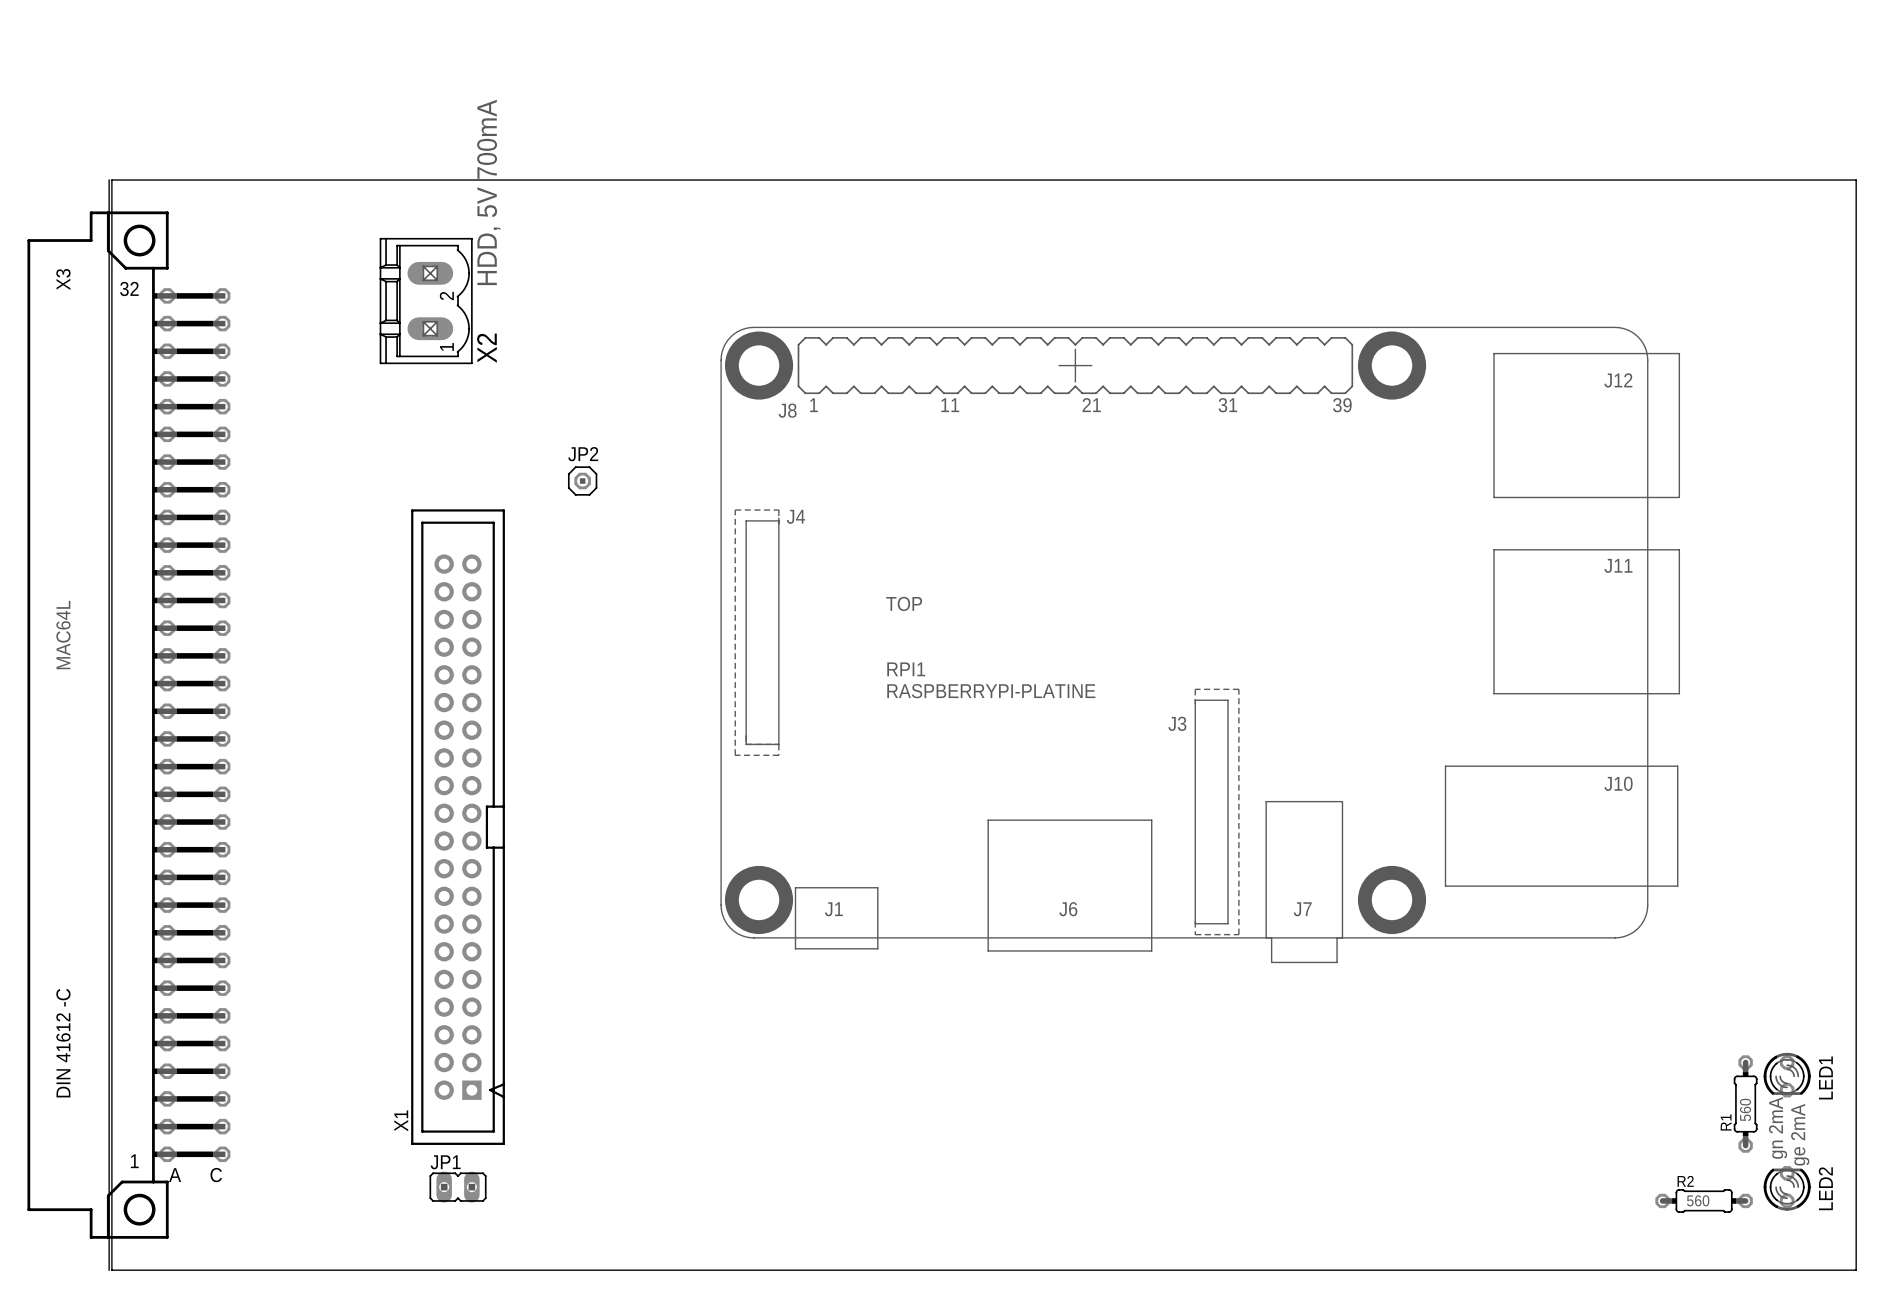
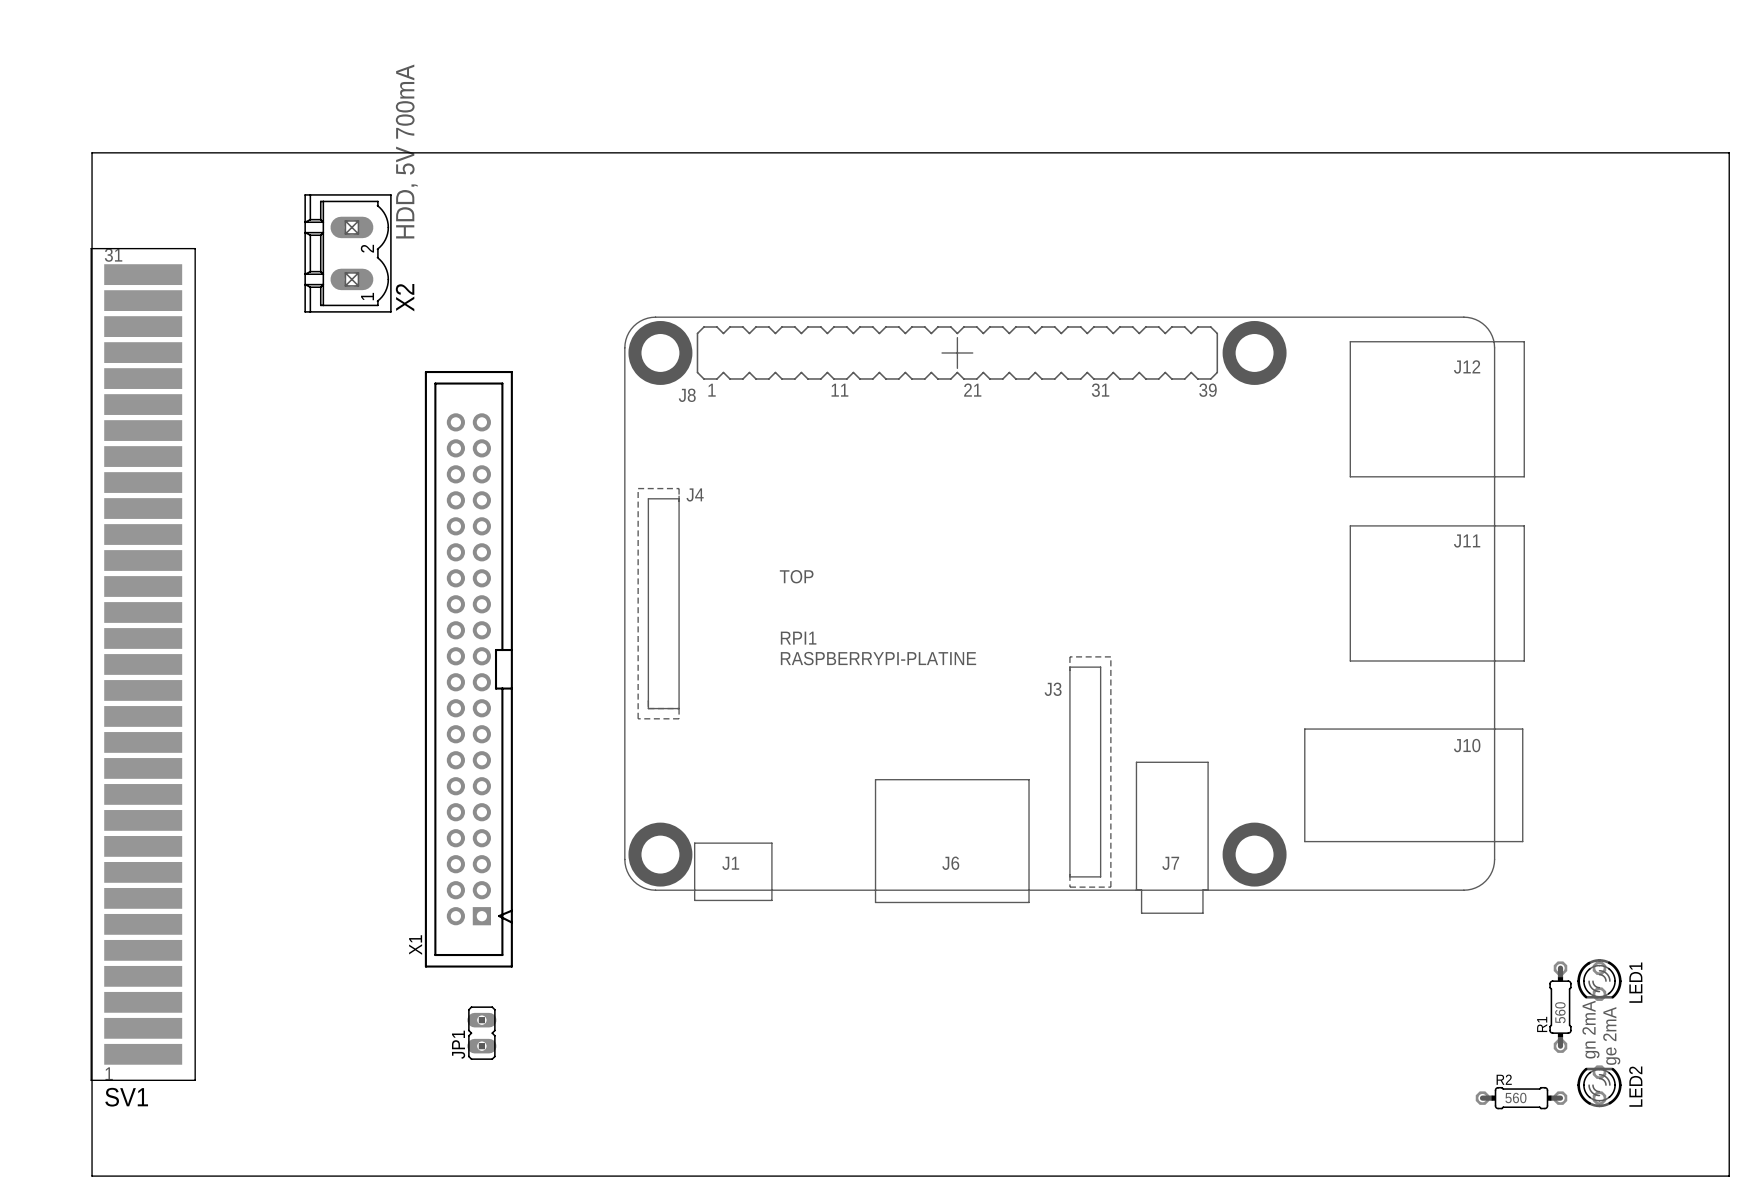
X2 position: (426, 301) -> (348, 253)
JP2: (582, 481) -> none
RPI1 position: (1200, 645) -> (1074, 615)
X3: MAC64L (128, 725) -> none
SV1: none -> (143, 664)
X1 position: (458, 827) -> (468, 669)
LED1 position: (1787, 1075) -> (1599, 979)
R1 position: (1745, 1104) -> (1560, 1007)
JP1 name position: JP1 (445, 1162) -> JP1 (458, 1044)
JP1 rotation: 0° (458, 1187) -> 90° clockwise (481, 1033)
JP1 position: (458, 1187) -> (481, 1033)
LED2 position: (1787, 1188) -> (1599, 1086)
R2 position: (1704, 1200) -> (1521, 1098)

